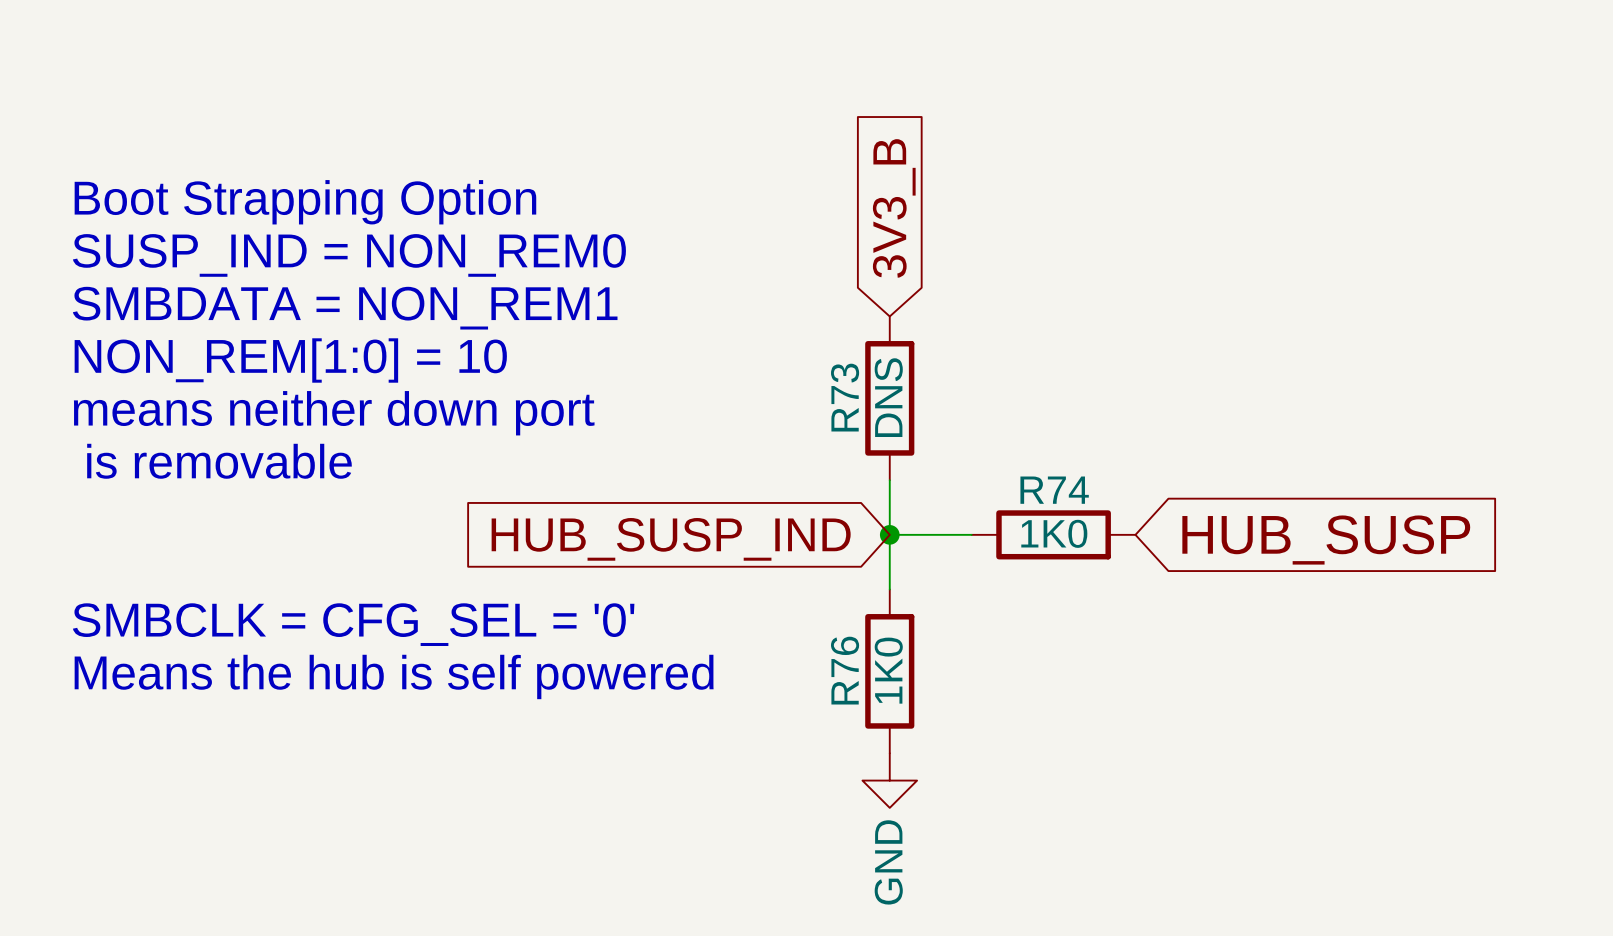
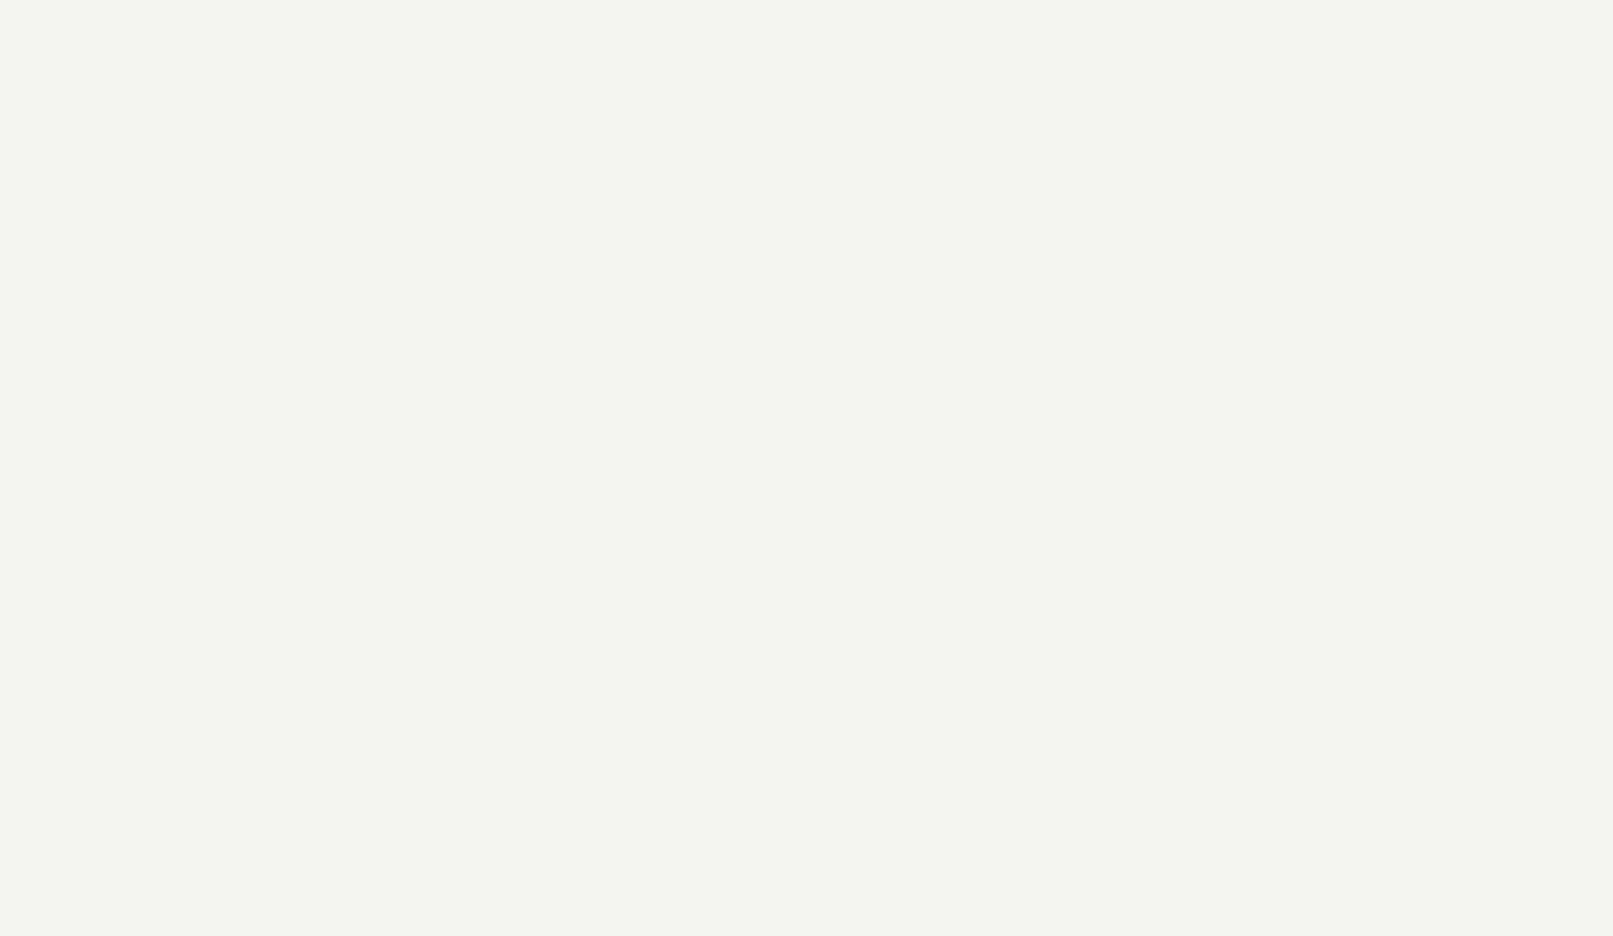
text: Boot Strapping Option (305, 202) -> none
global label: 3V3_B (894, 208) -> none
text: SUSP_IND = NON_REM0 (349, 255) -> none
text: SMBDATA = NON_REM1 (345, 308) -> none
text: NON_REM[1:0] = 10 (290, 360) -> none
R73: DNS (889, 398) -> none
text: means neither down port (334, 413) -> none
text: is removable (219, 461) -> none
wire: (889, 480) (889, 589) -> none
wire: (889, 534) (971, 534) -> none
junction: (889, 534) -> none
R74: 1K0 (1053, 534) -> none
global label: HUB_SUSP_IND (671, 539) -> none
global label: HUB_SUSP (1326, 540) -> none
text: SMBCLK = CFG_SEL = '0' (353, 624) -> none
R76: 1K0 (889, 671) -> none
text: Means the hub is self powered (394, 676) -> none
power symbol: GND (889, 780) -> none

